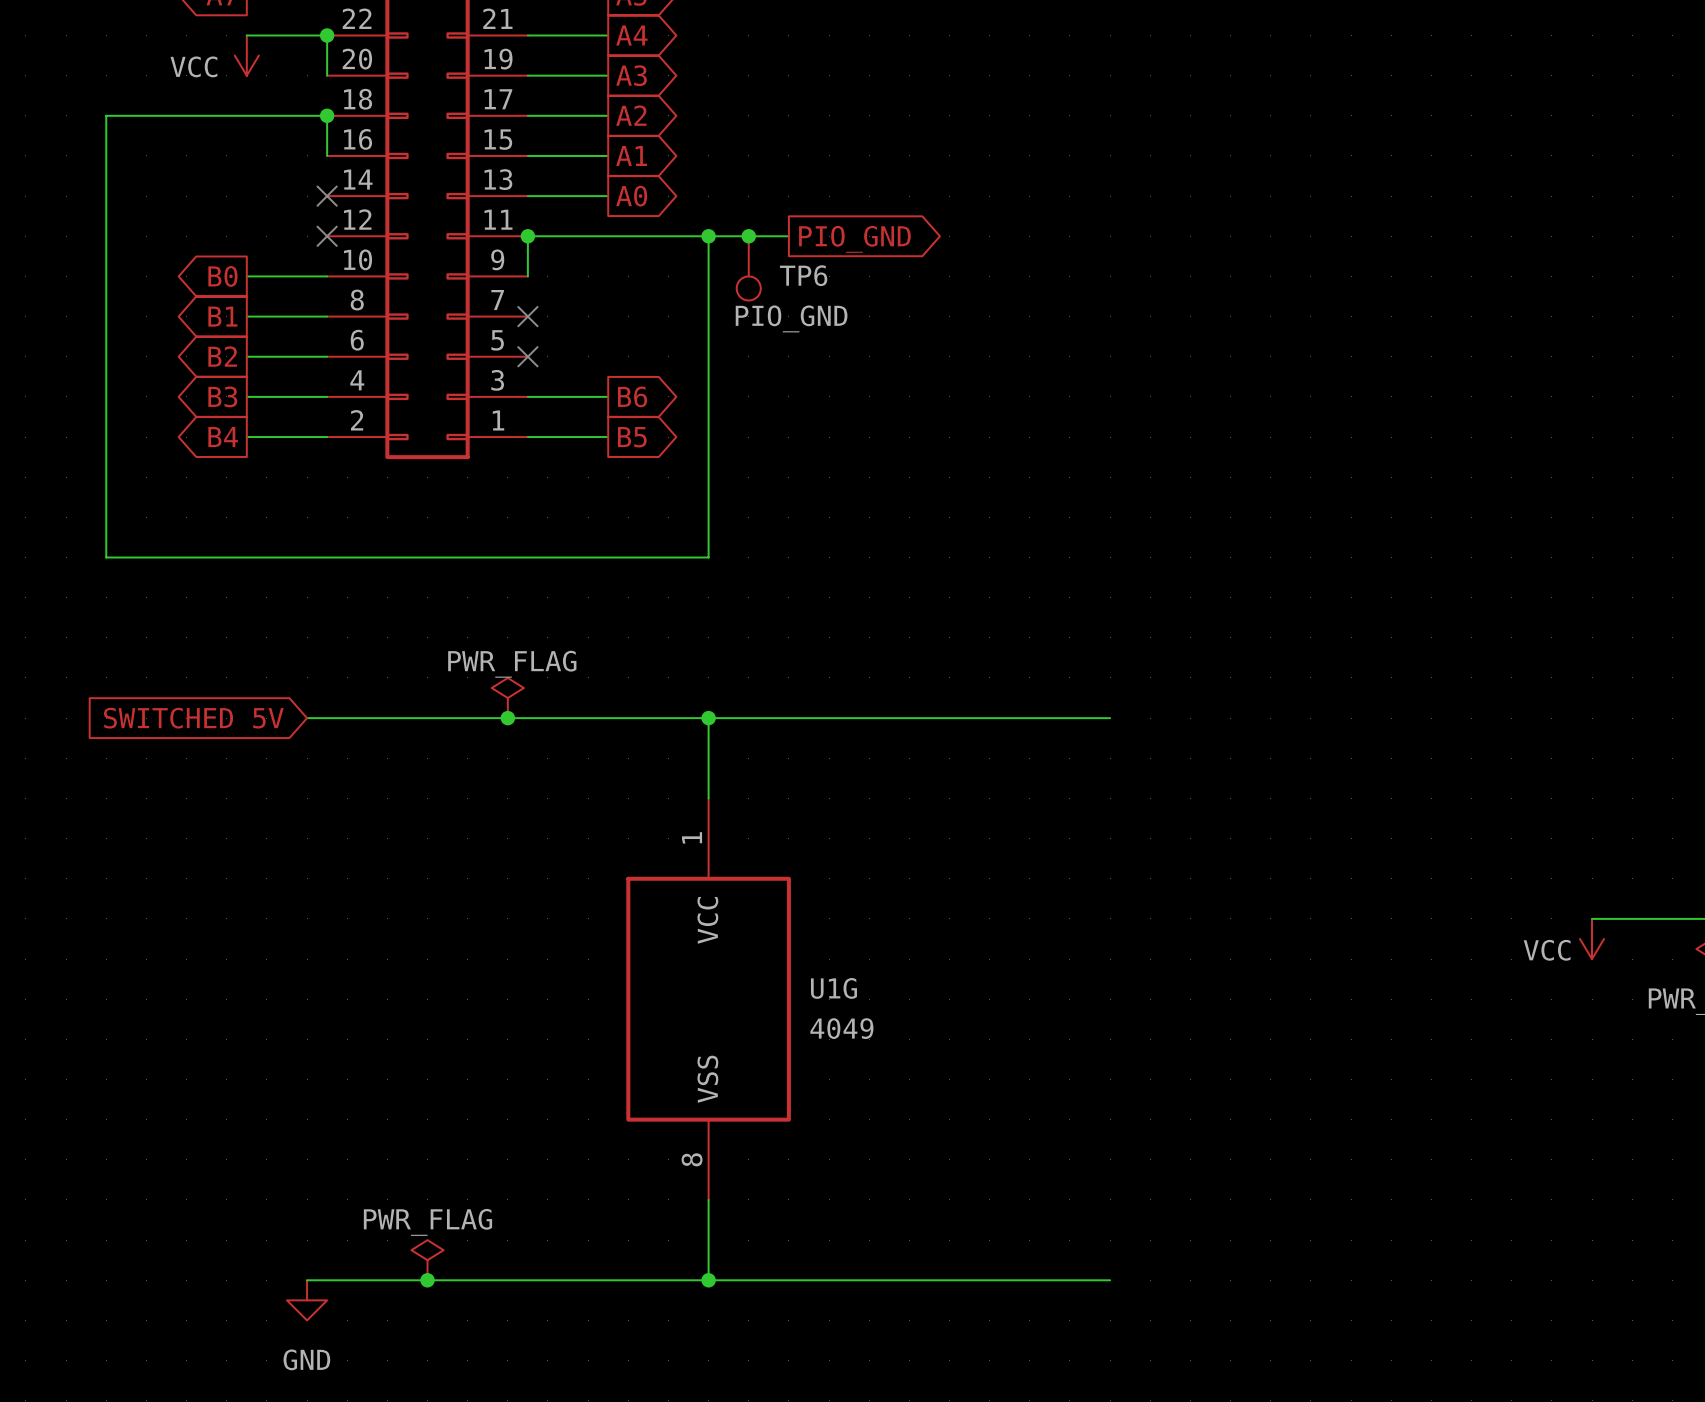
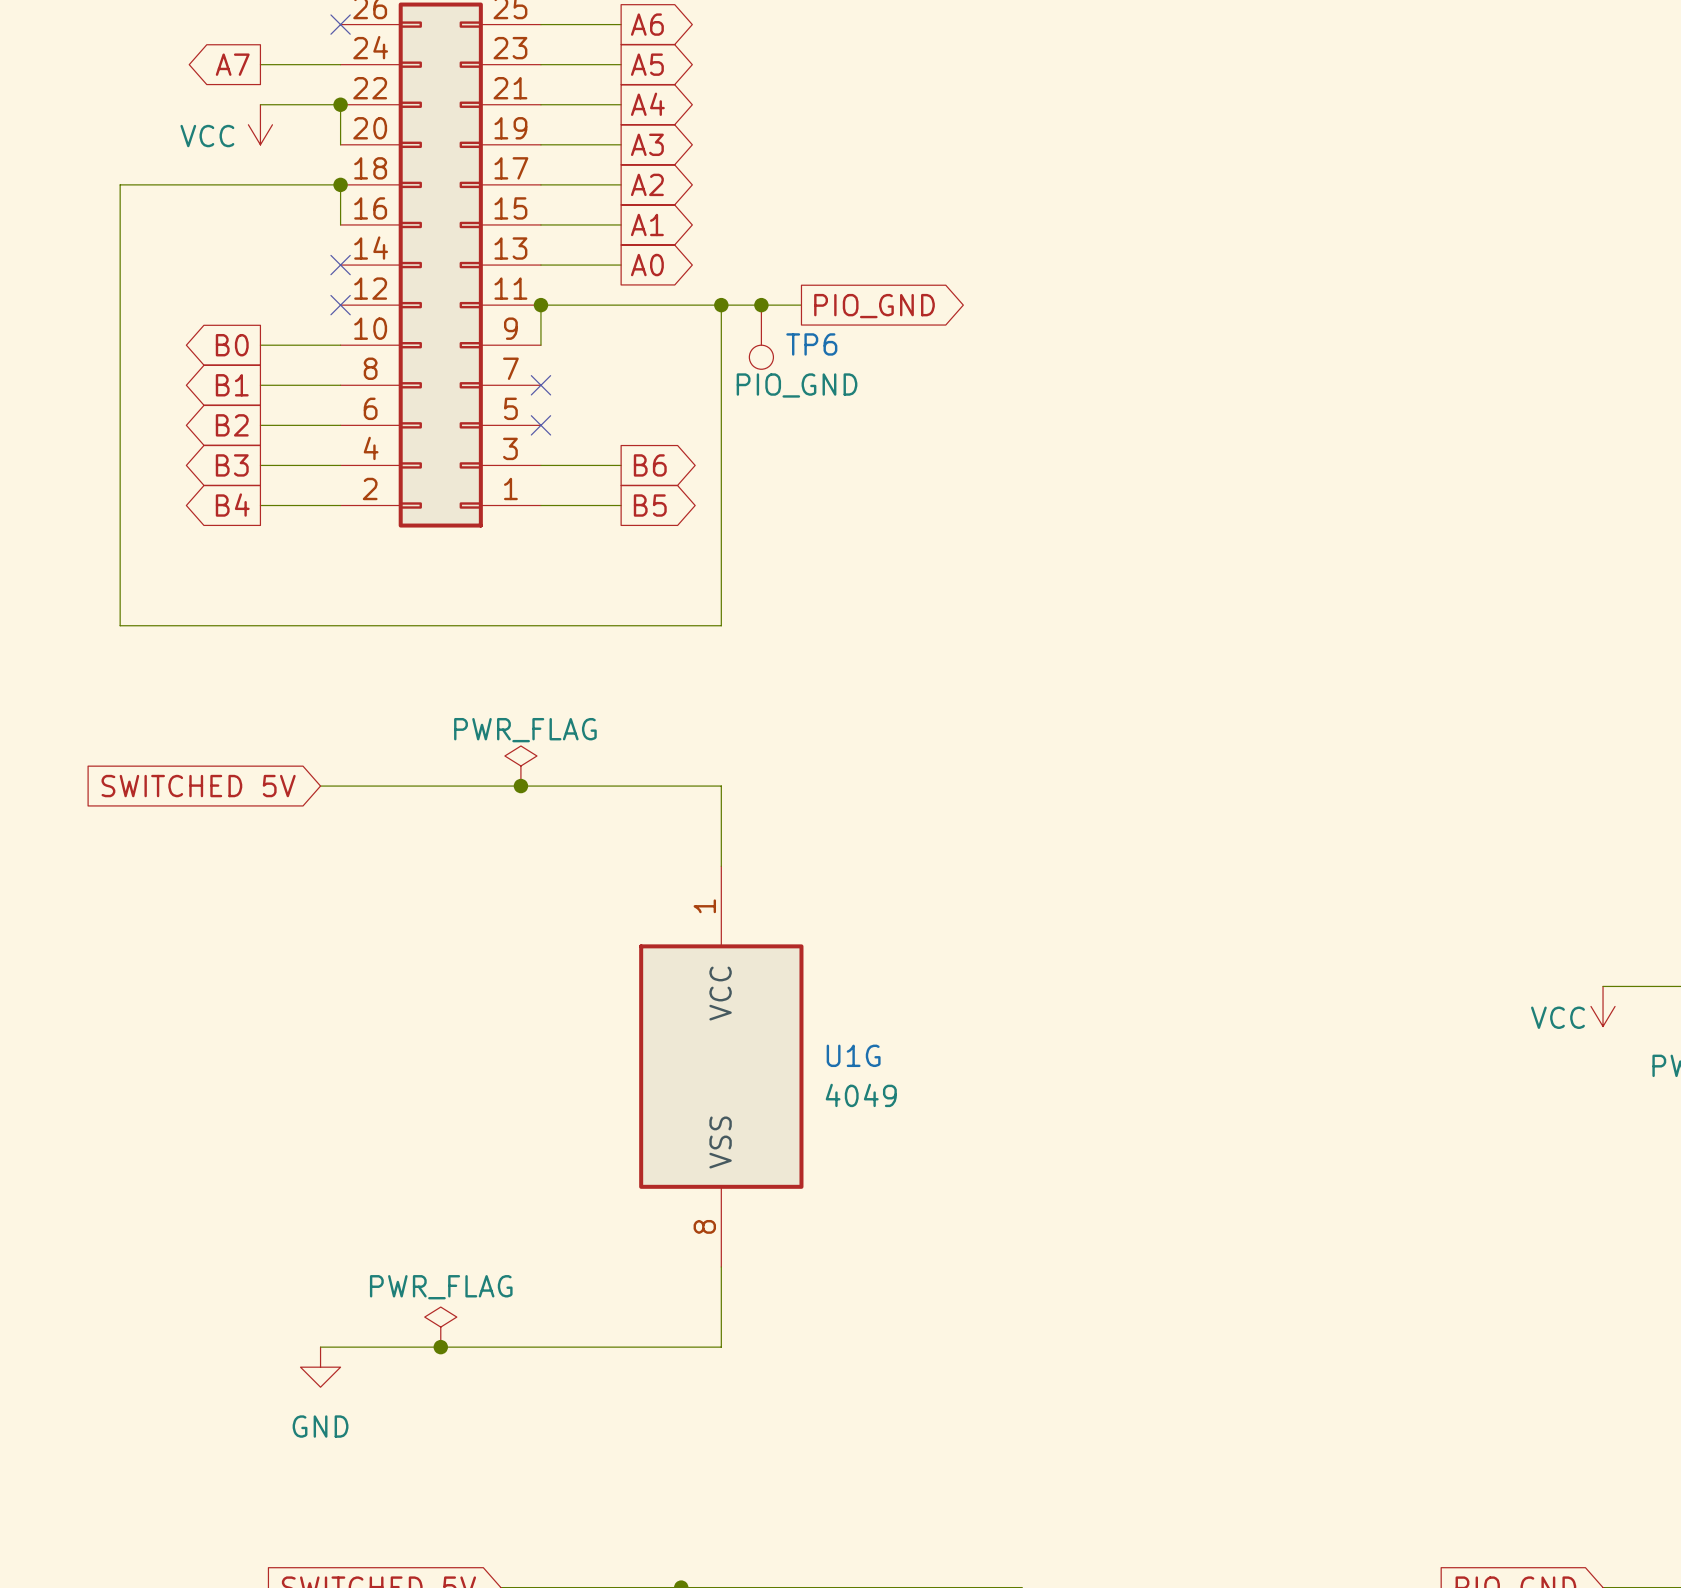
wire: (708, 718) (1110, 718) -> none
junction: (708, 718) -> none
wire: (708, 1280) (1110, 1280) -> none
junction: (708, 1280) -> none

